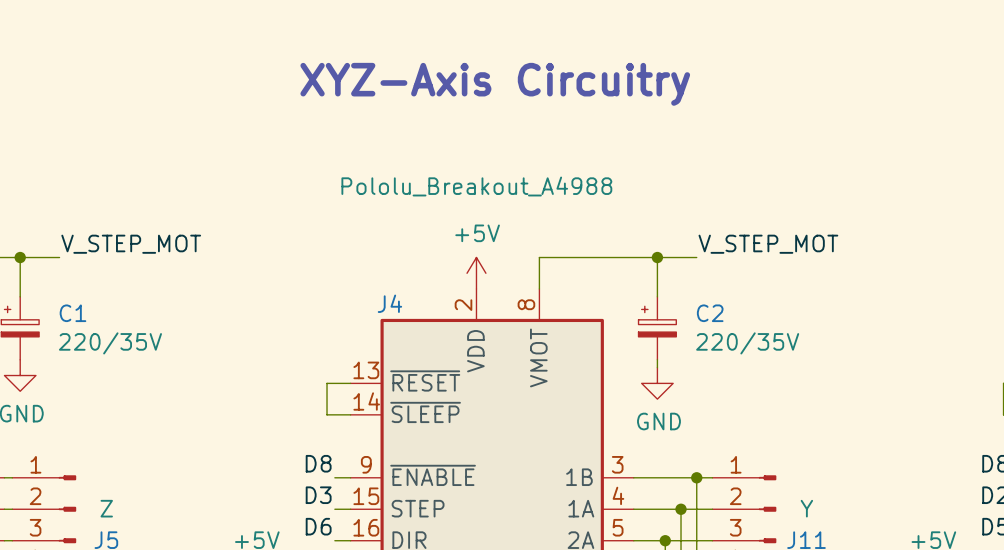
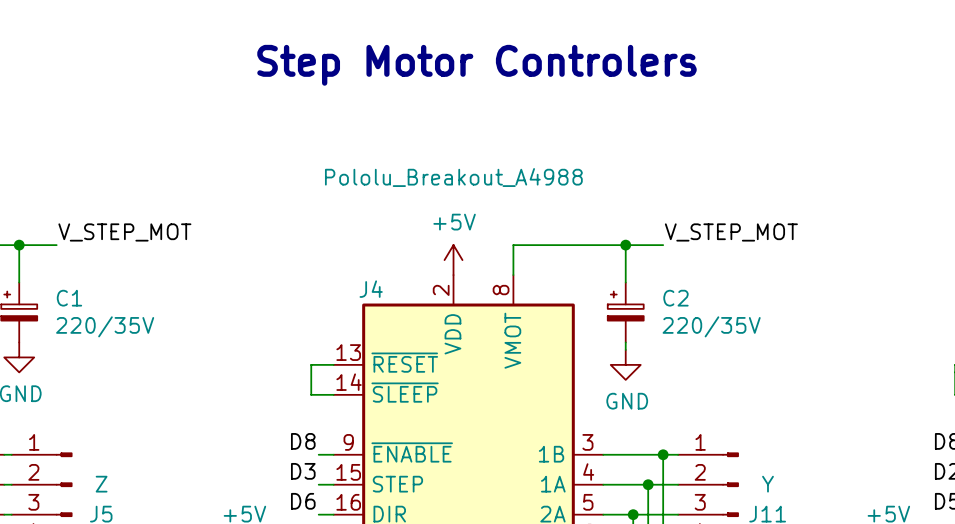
text: none -> Step Motor Controlers (476, 65)
text: XYZ-Axis Circuitry (495, 84) -> none

